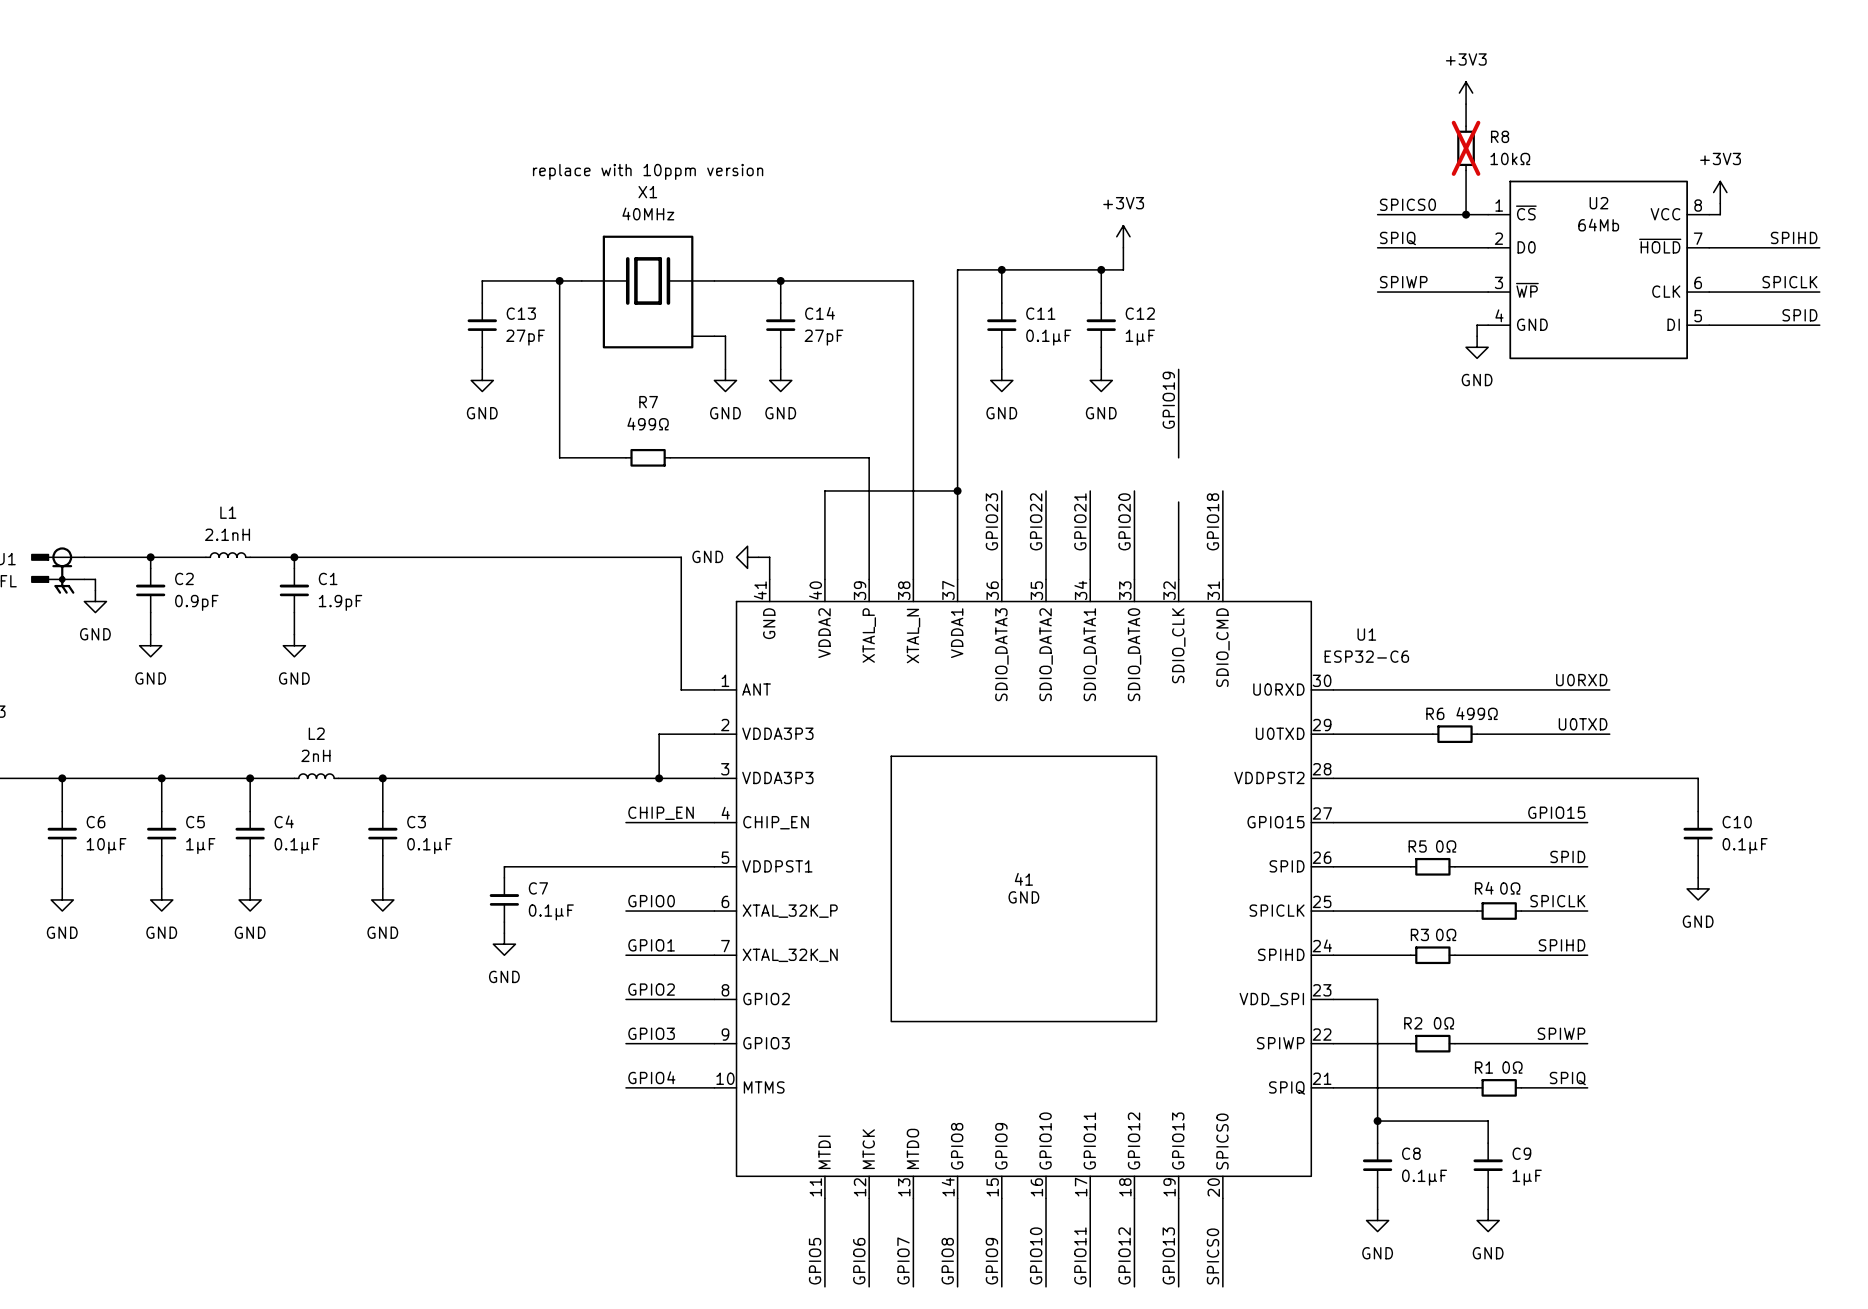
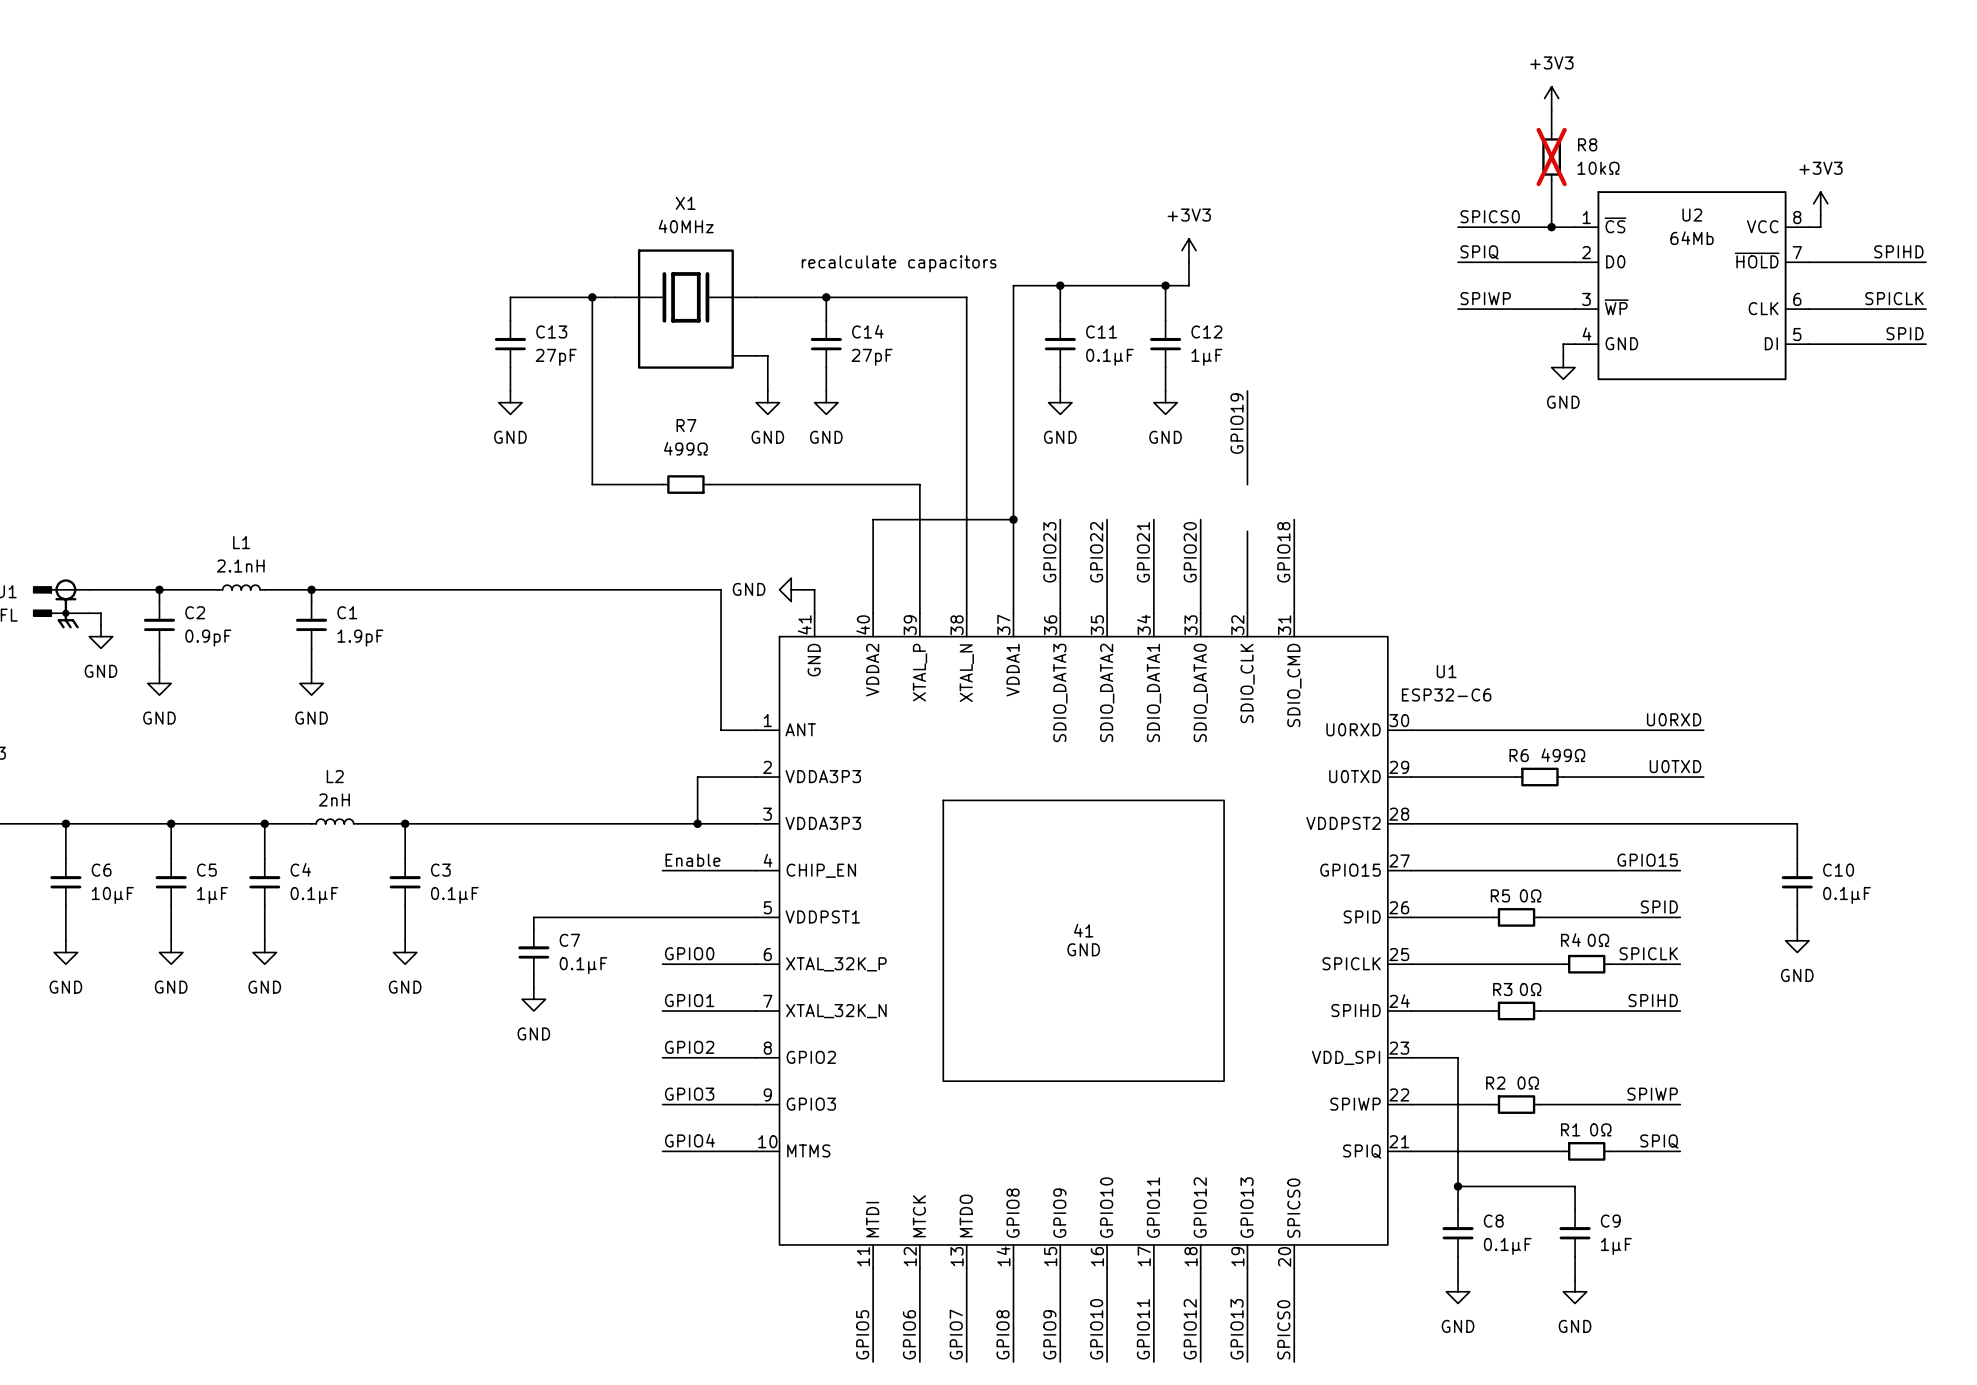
text: replace with 10ppm version (648, 171) -> none
text: none -> recalculate capacitors (899, 263)
label: CHIP_EN (661, 813) -> Enable (692, 860)

